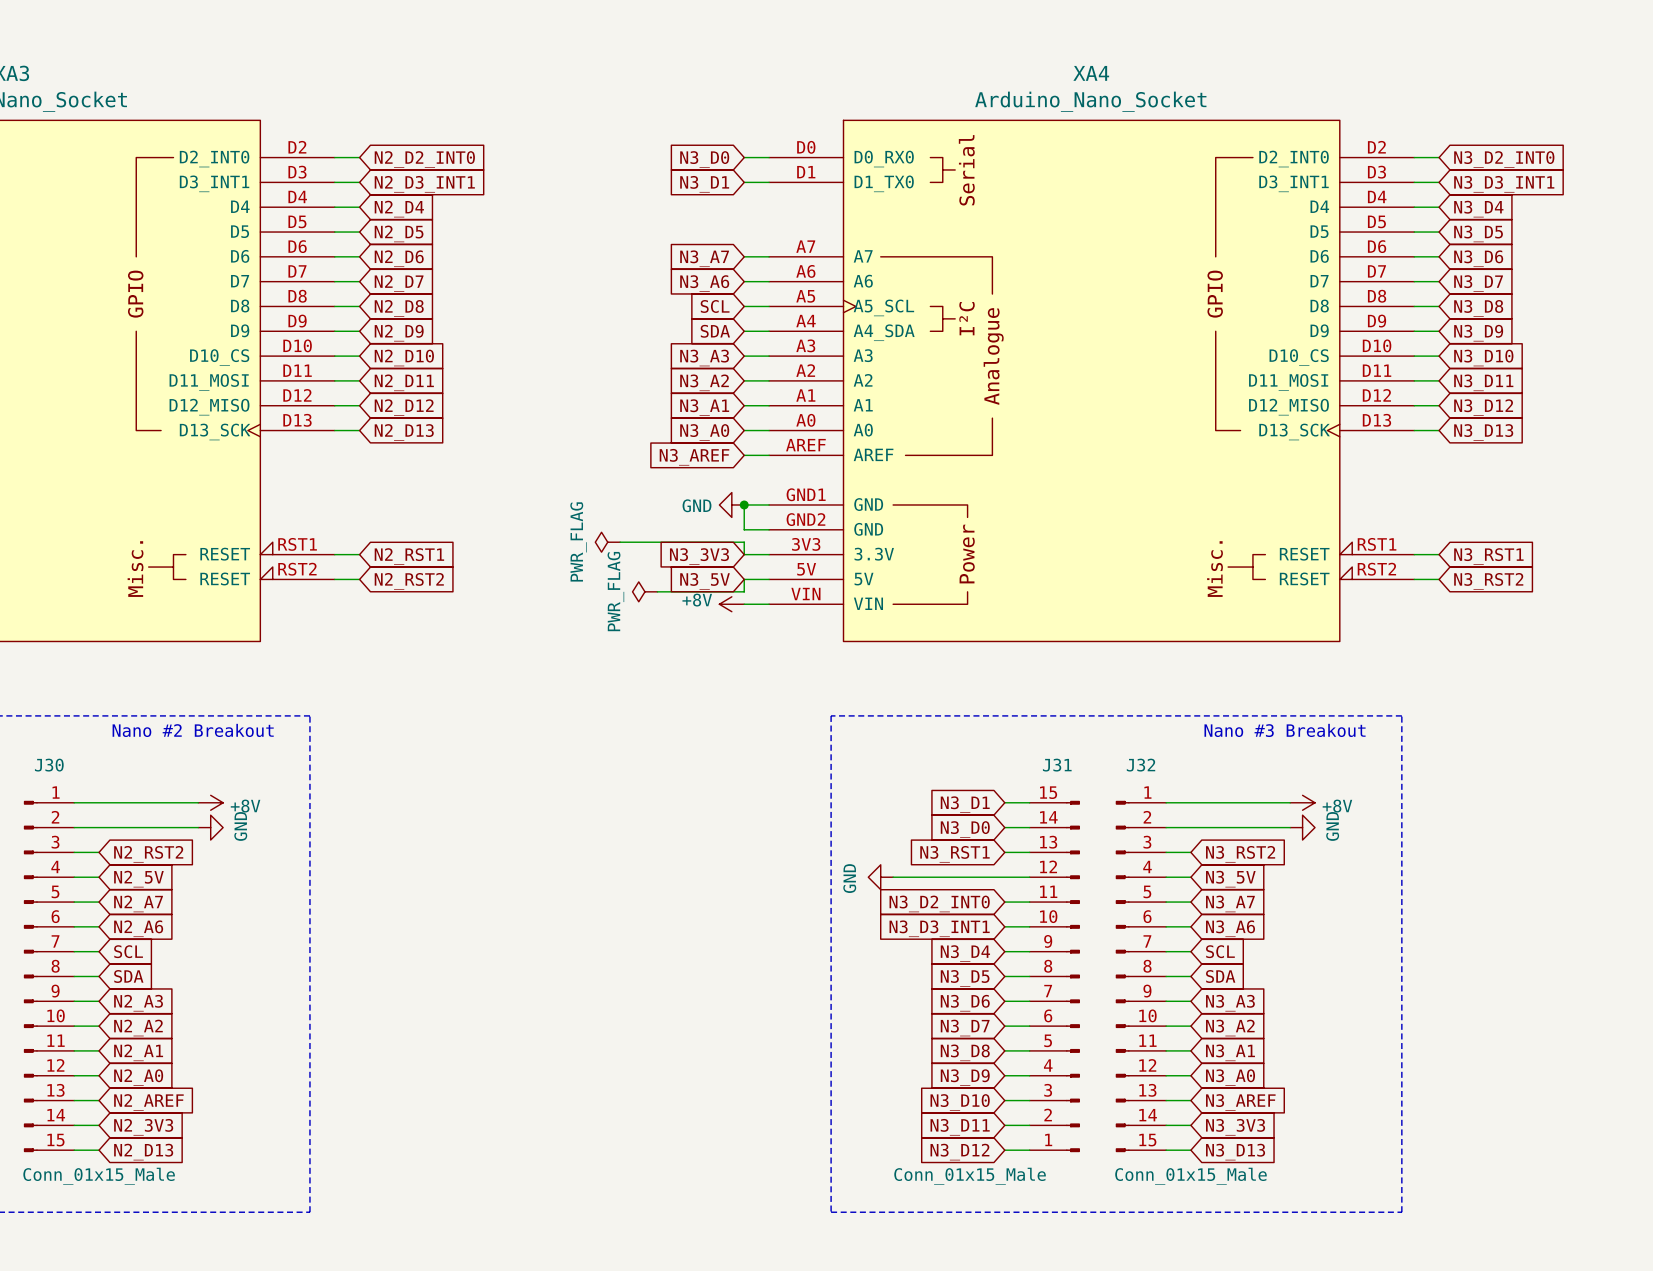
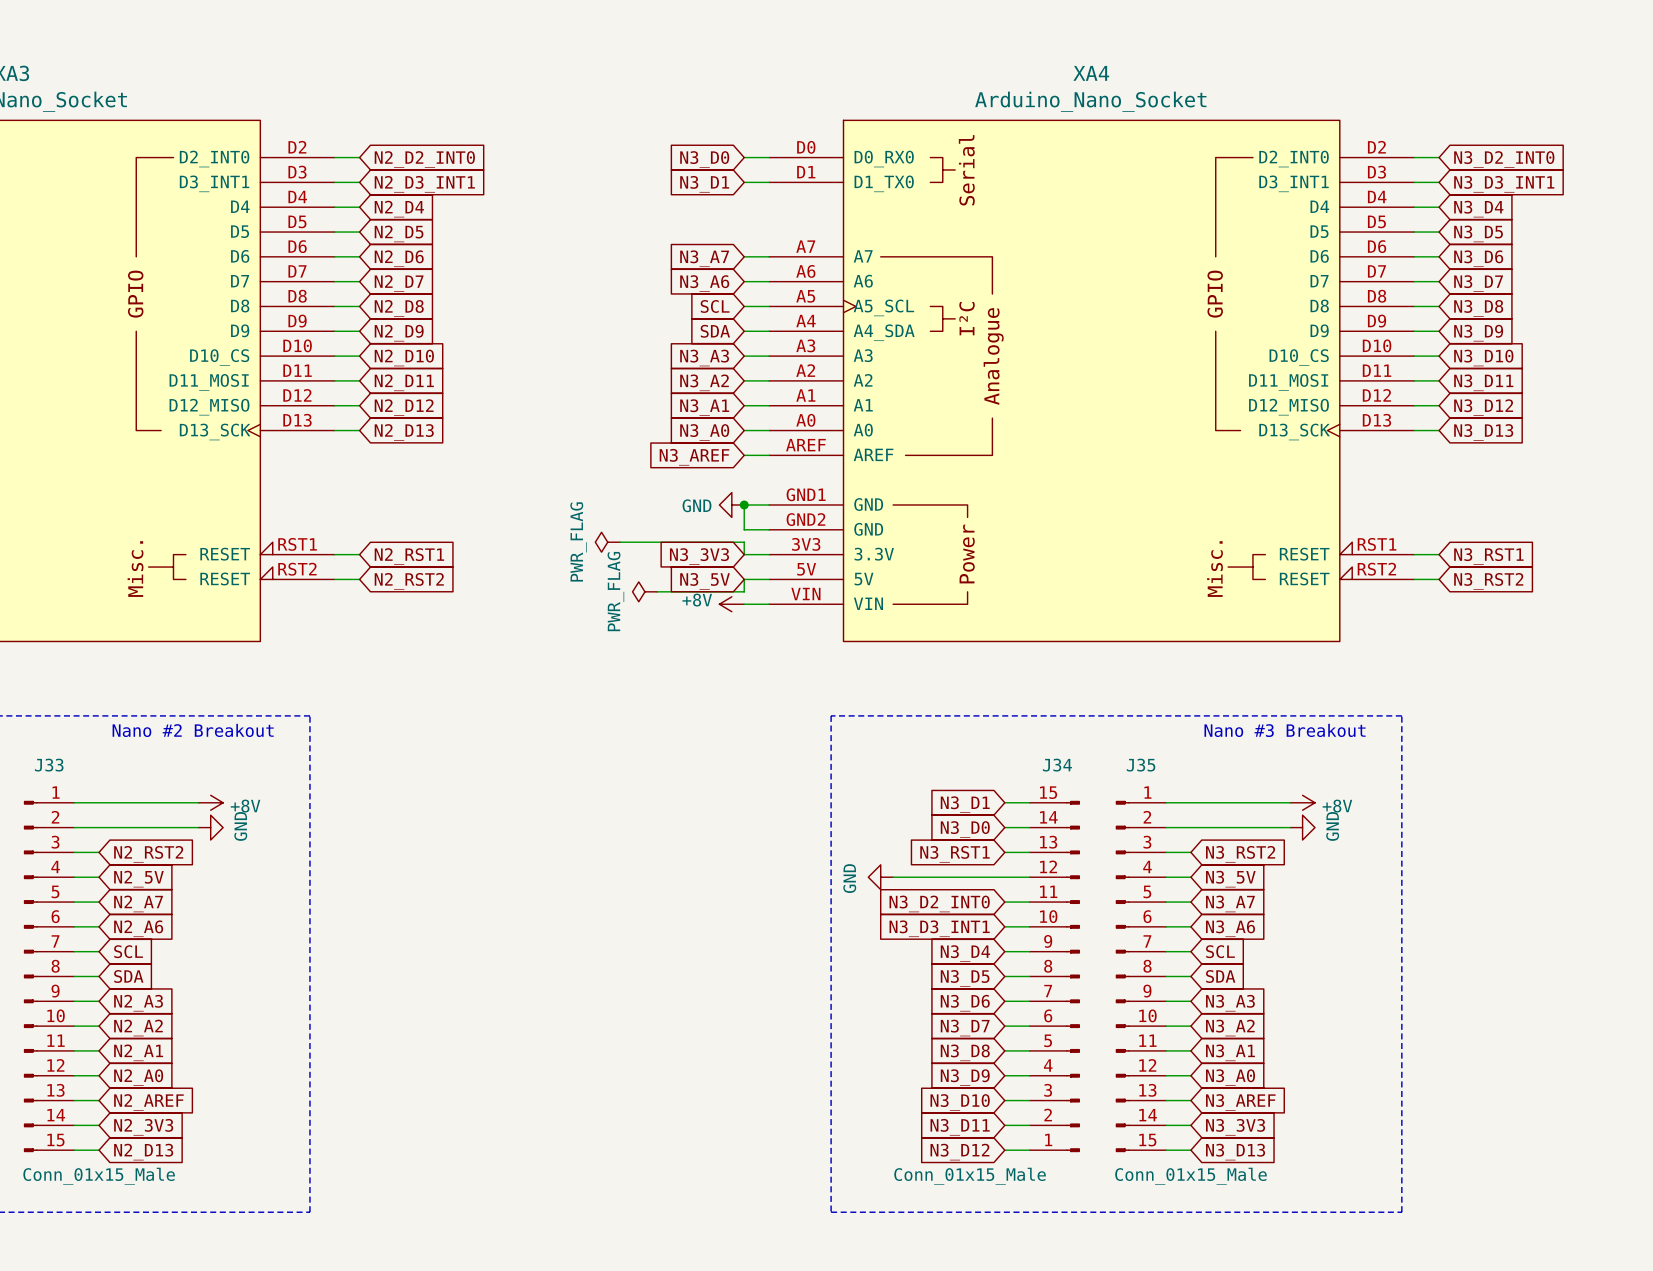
J30 name: J30 (49, 765) -> J33 (49, 765)
J31 name: J31 (1057, 765) -> J34 (1057, 765)
J32 name: J32 (1141, 765) -> J35 (1141, 765)

